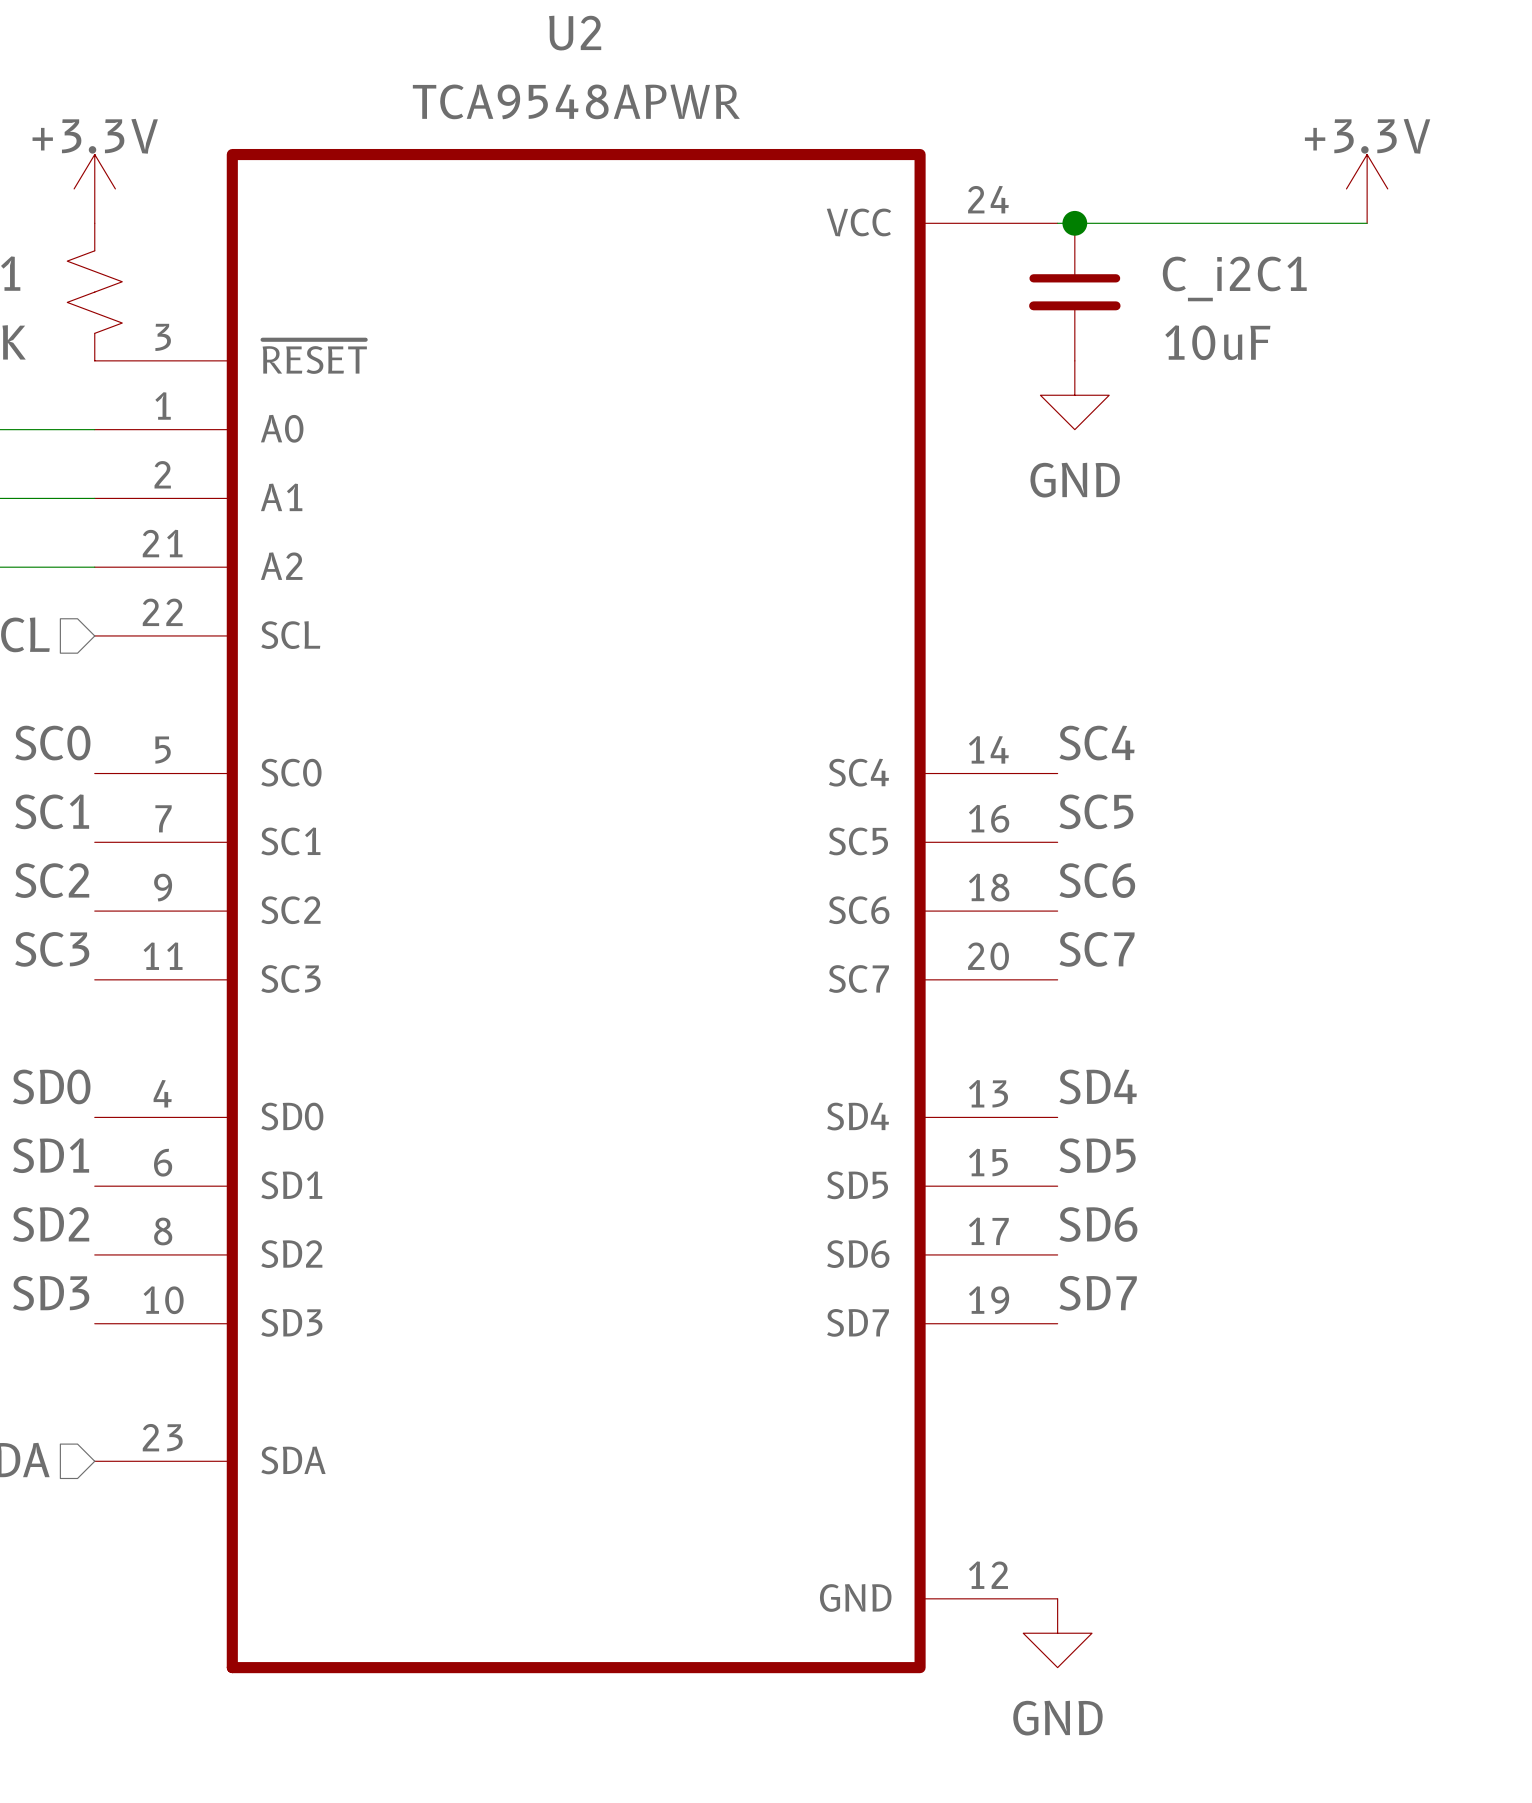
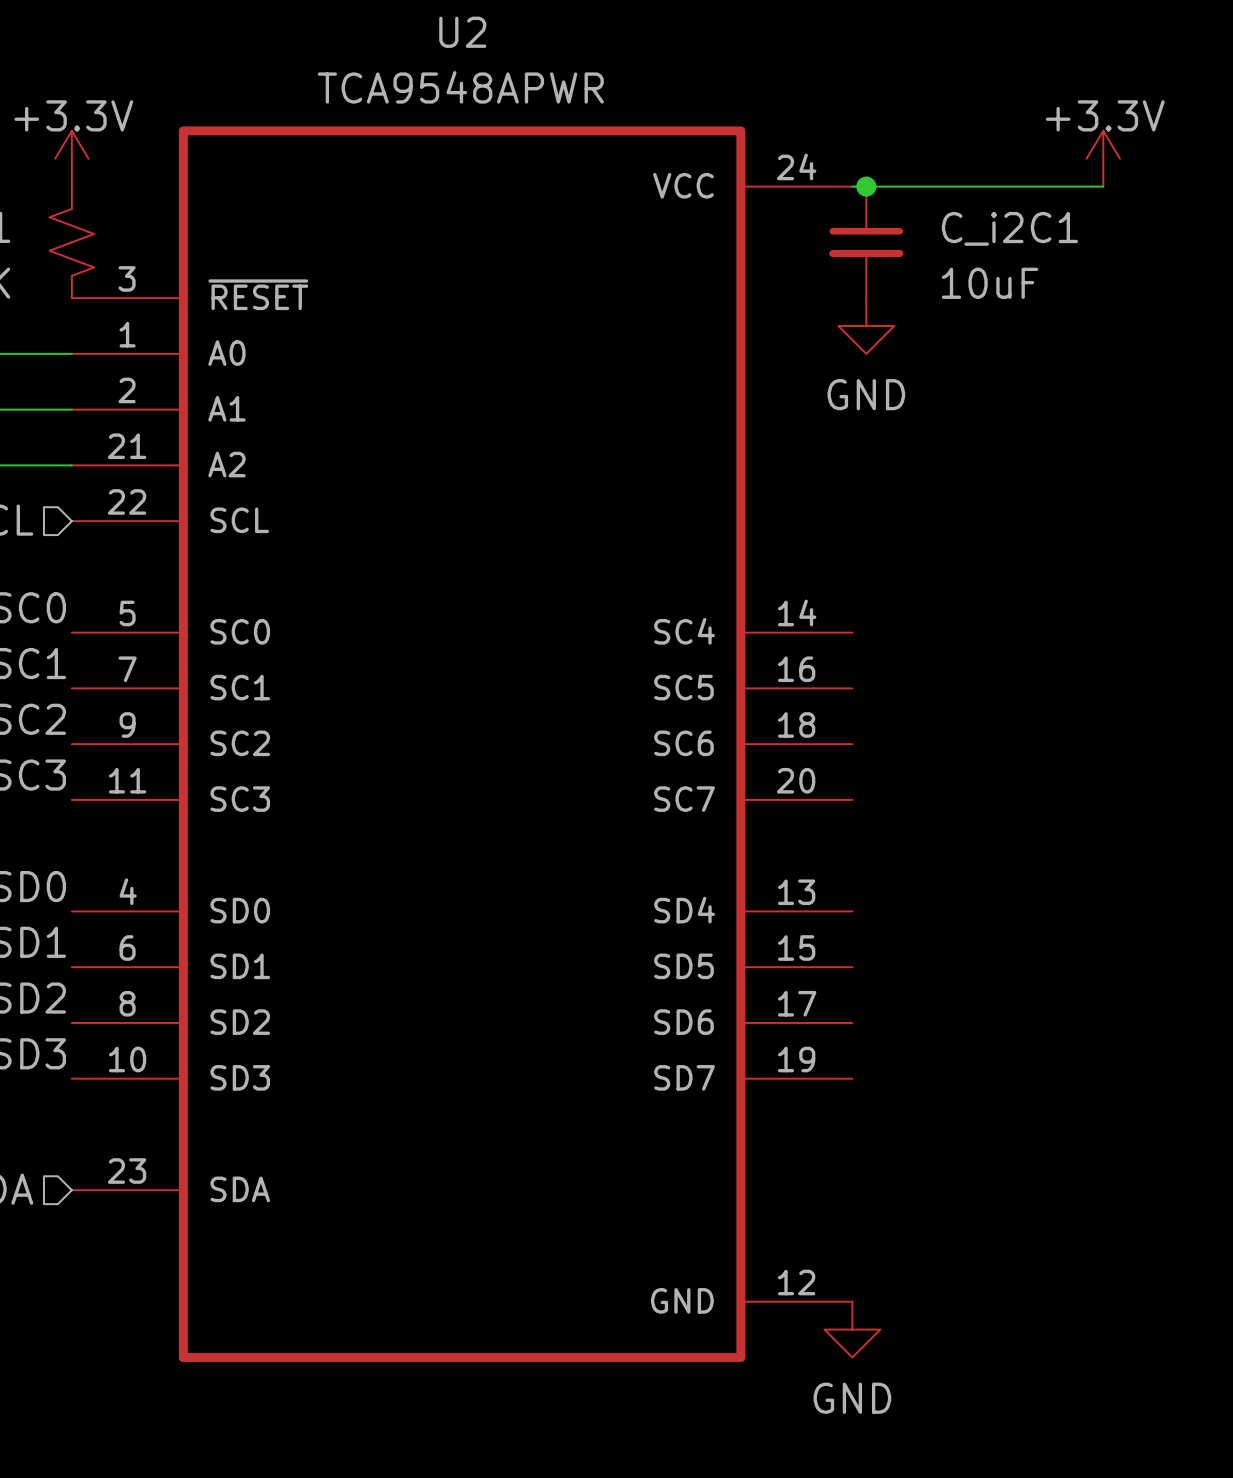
label: SC4 (1097, 743) -> none
label: SC5 (1096, 811) -> none
label: SC6 (1097, 880) -> none
label: SC7 (1097, 949) -> none
label: SD4 (1098, 1086) -> none
label: SD5 (1097, 1155) -> none
label: SD6 (1098, 1224) -> none
label: SD7 (1098, 1293) -> none

